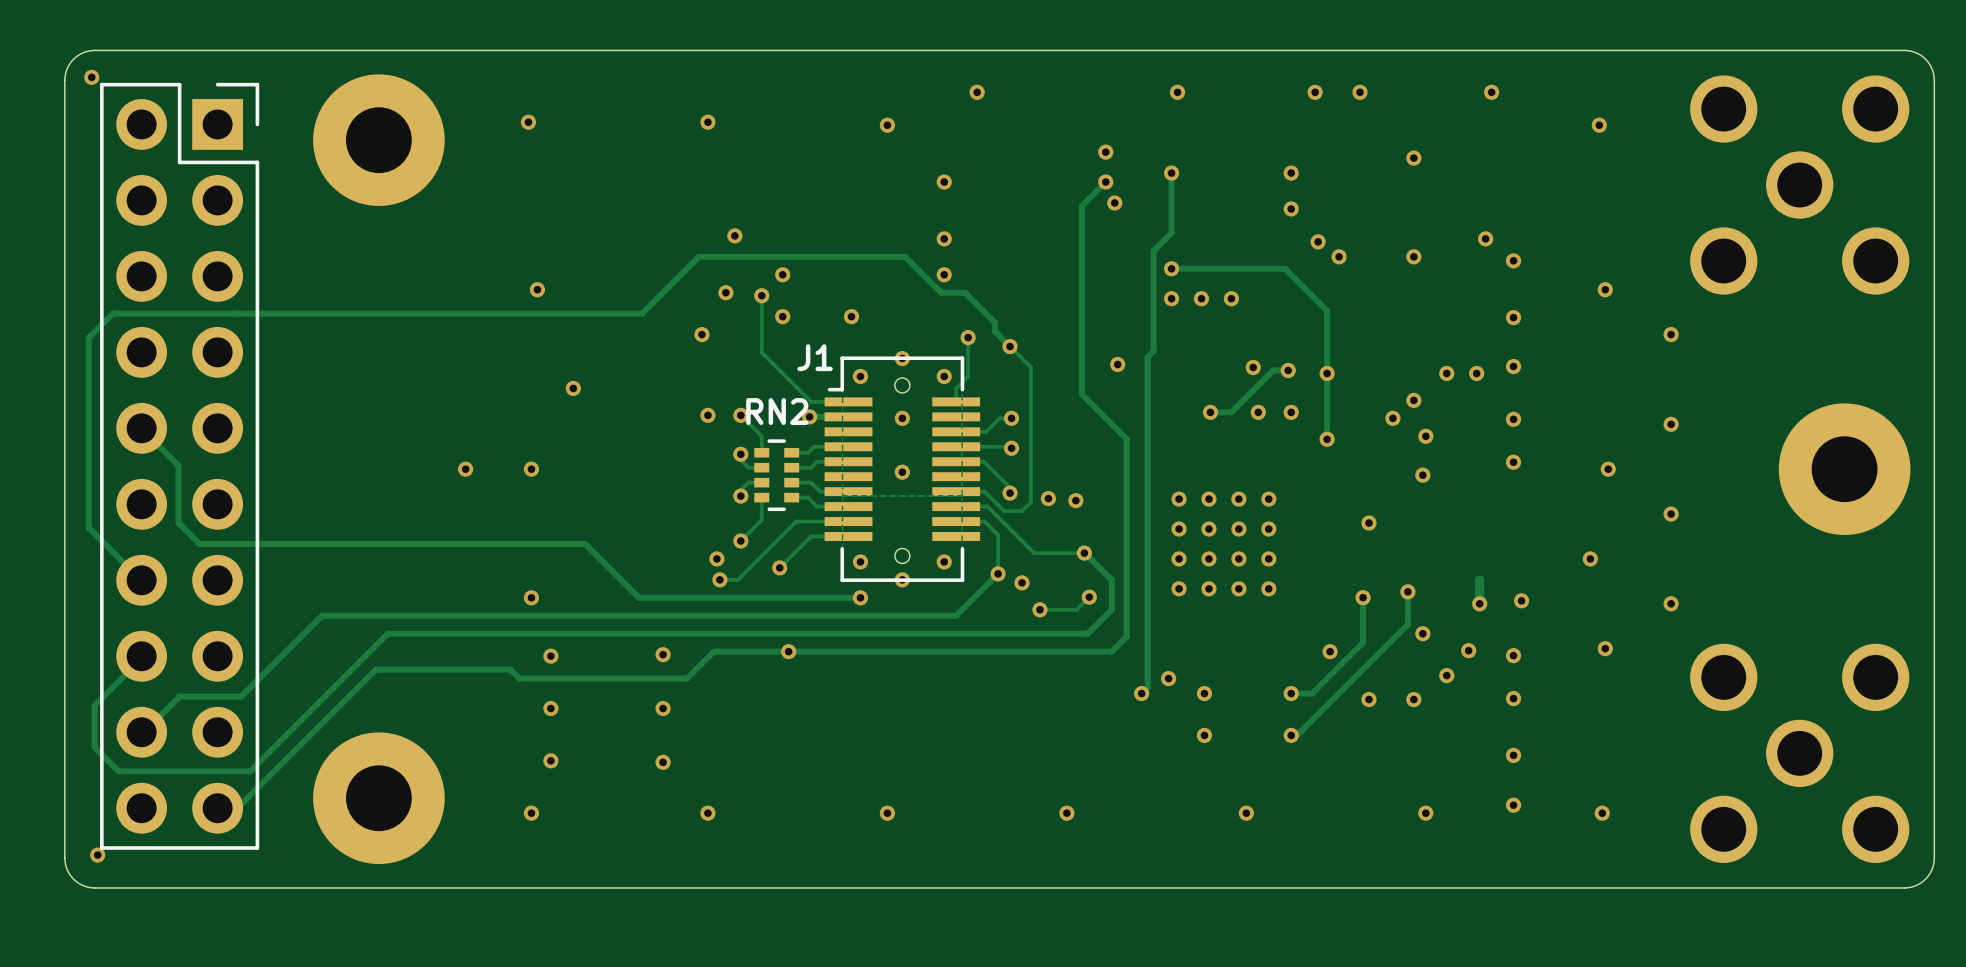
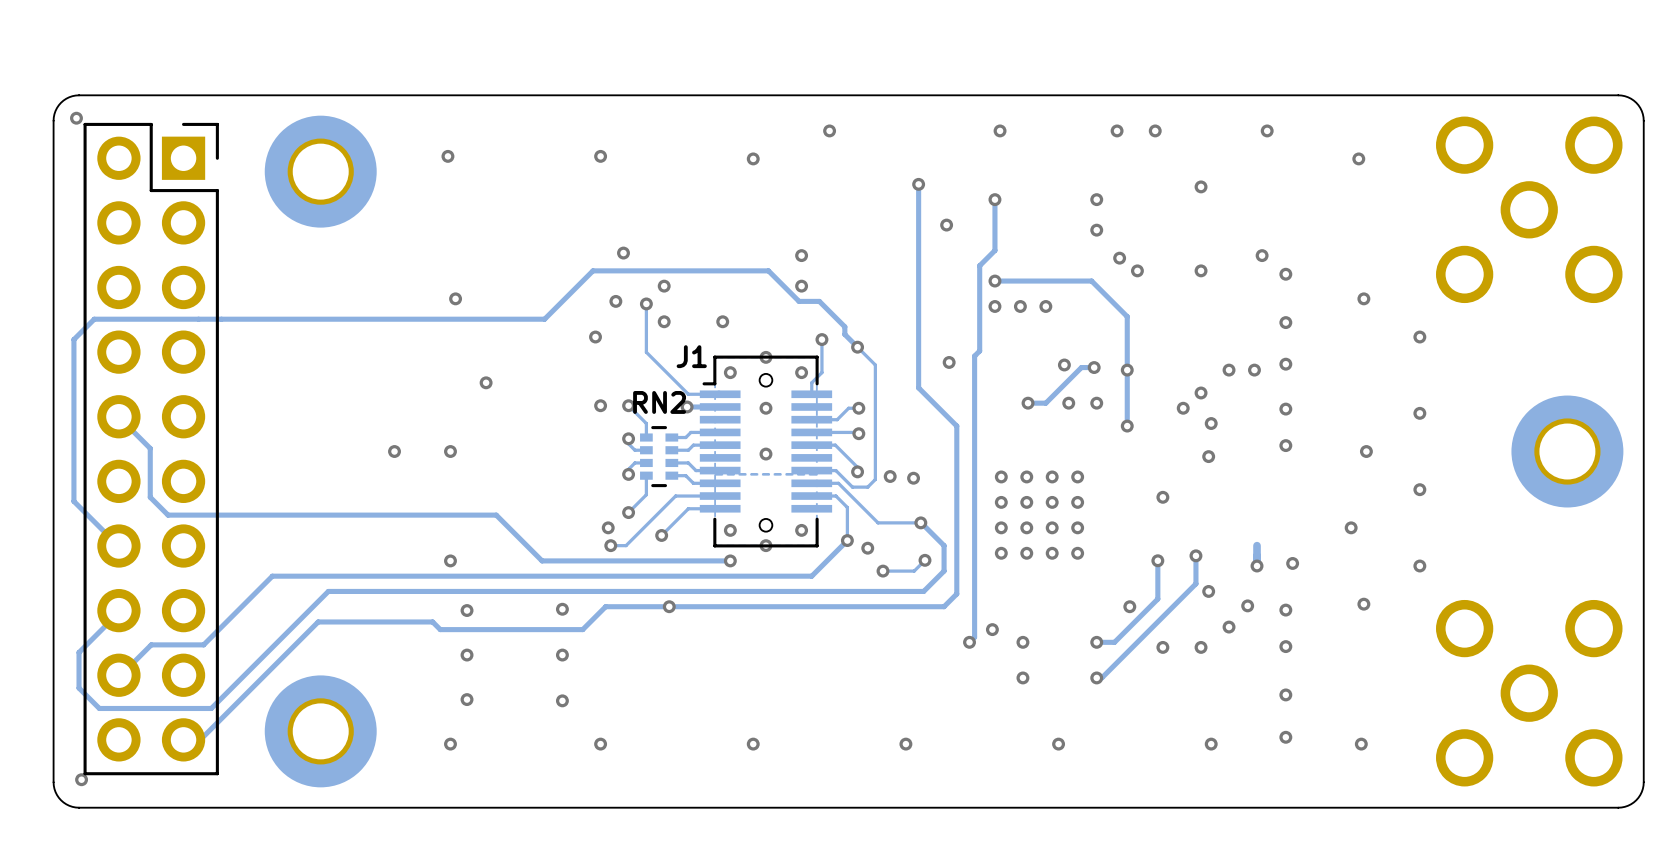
via: (1105, 152) -> none
via: none -> (918, 184)
via: (944, 182) -> none
track: (1105, 182) (1081, 205) -> (918, 184) (918, 227)
via: (1105, 182) -> none

